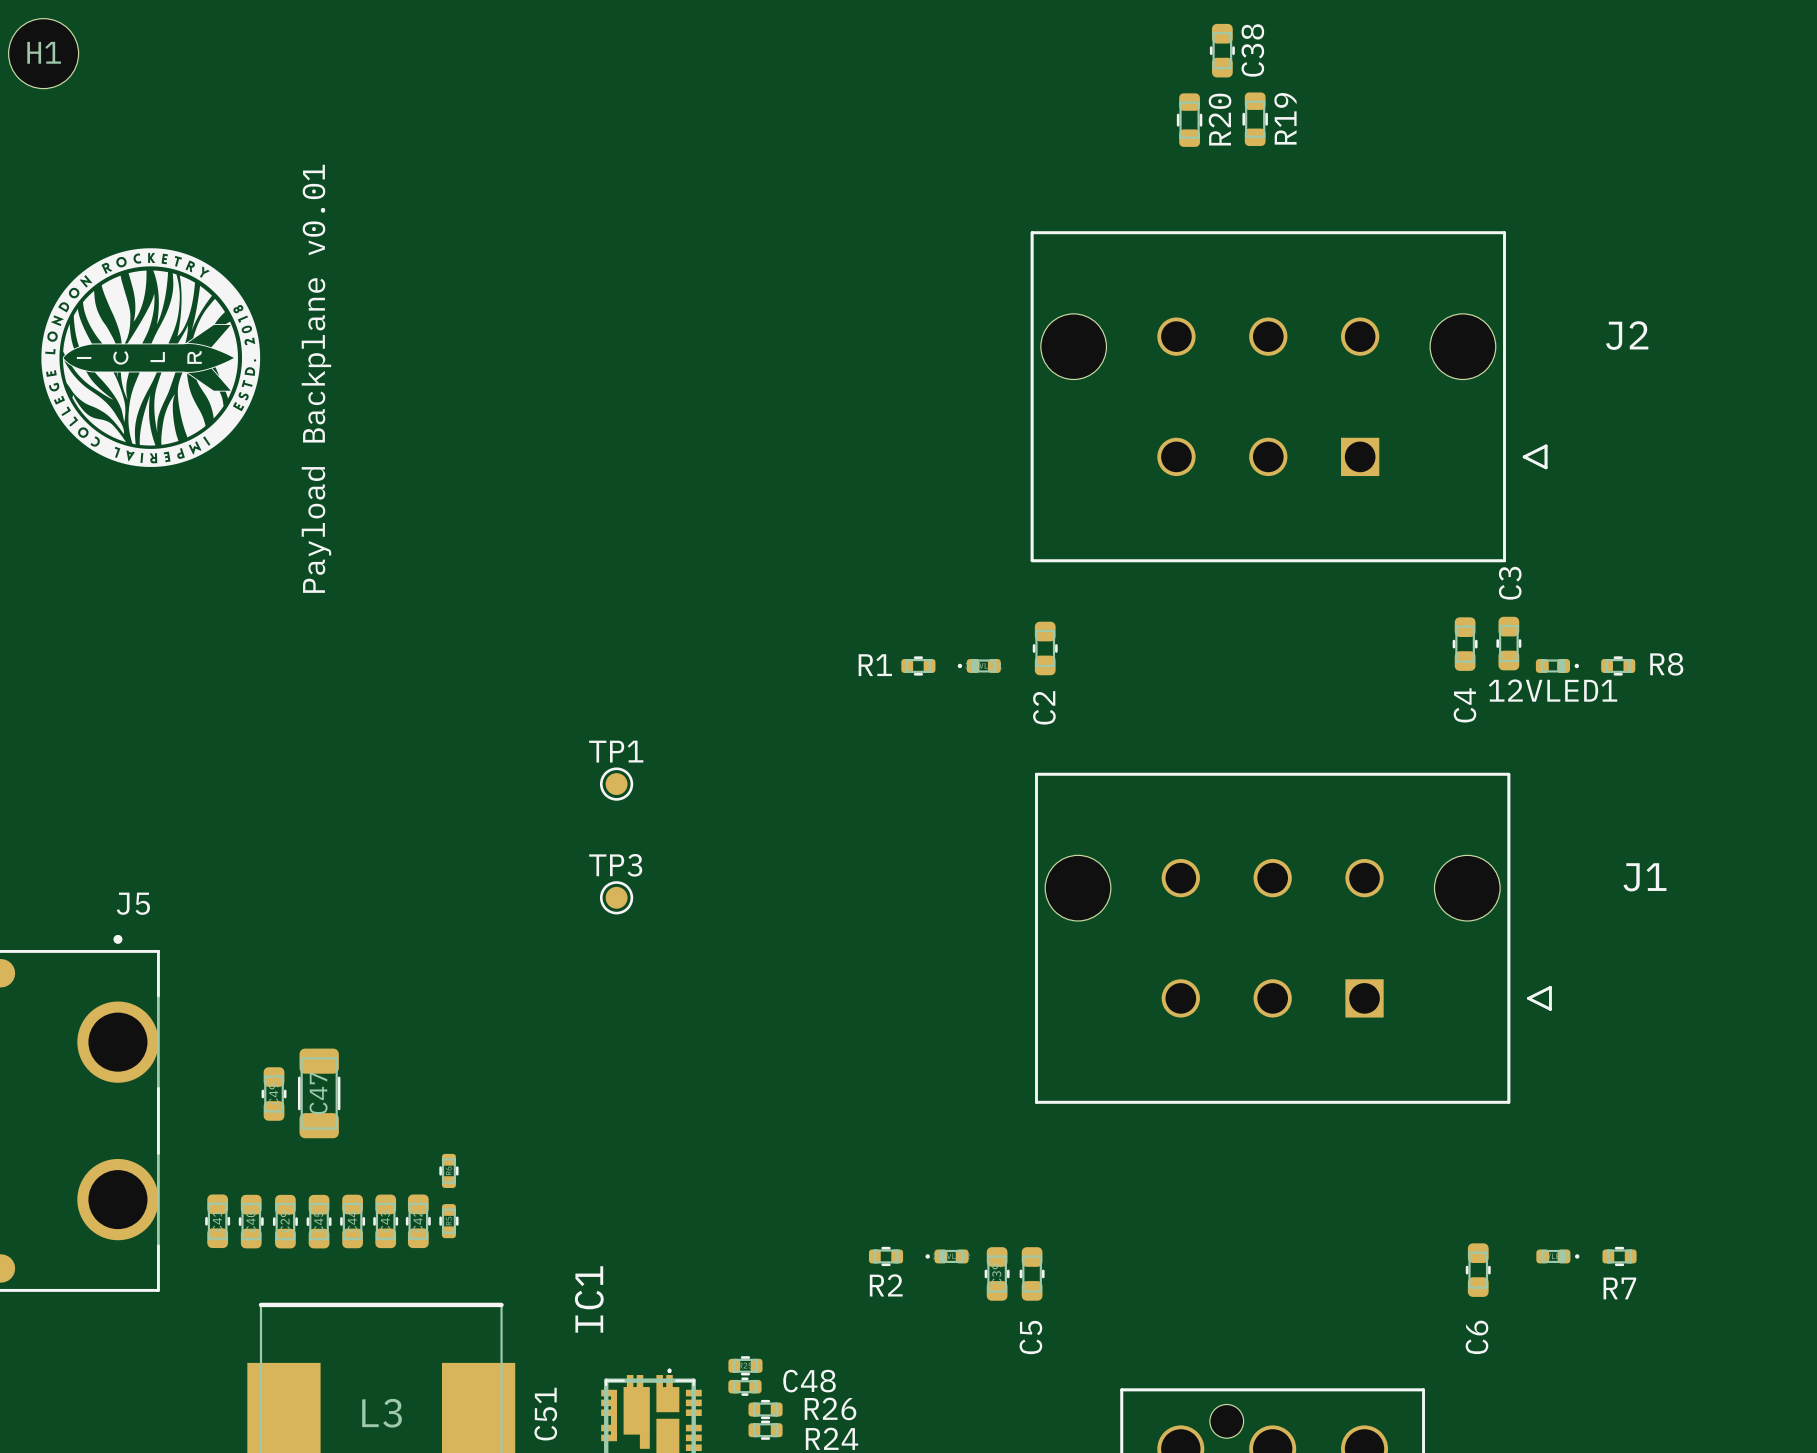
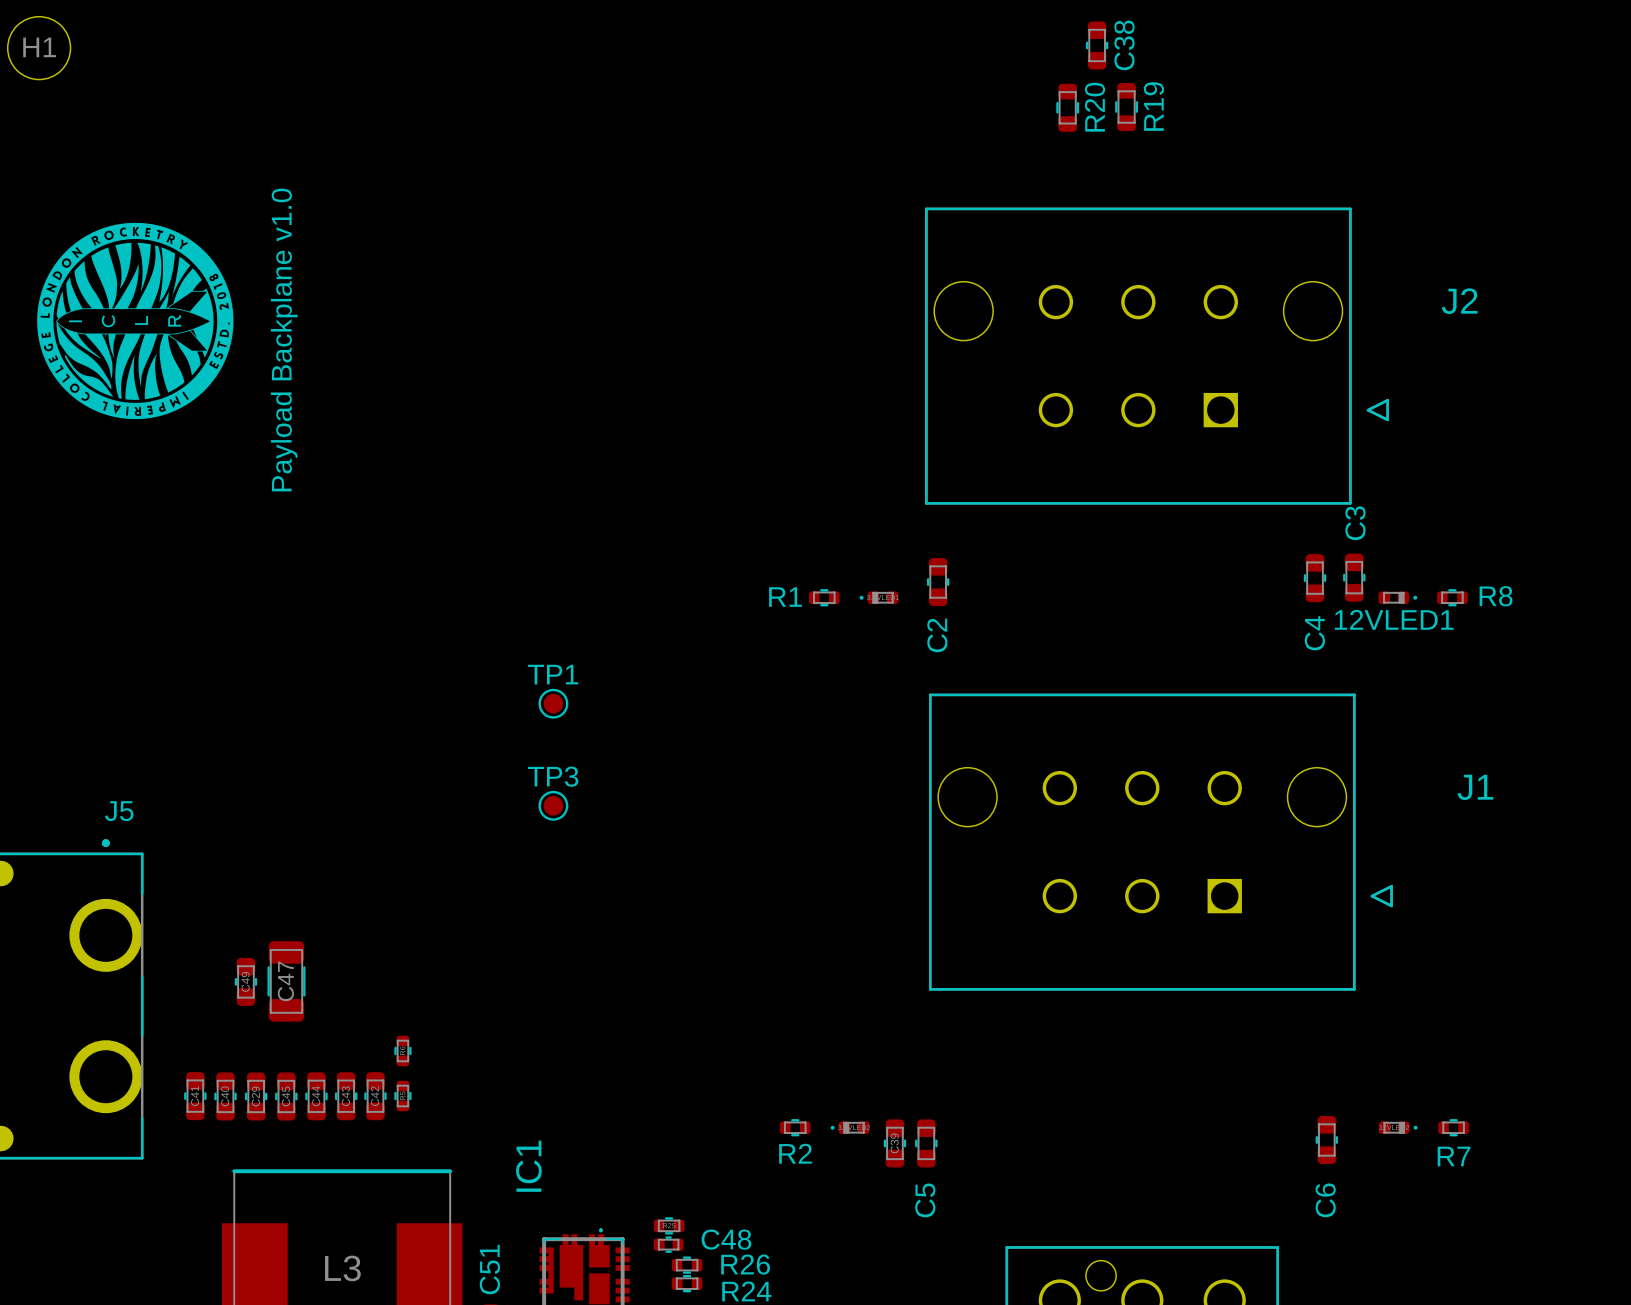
text: Payload Backplane v0.01 (316, 378) -> Payload Backplane v1.0 (284, 339)

